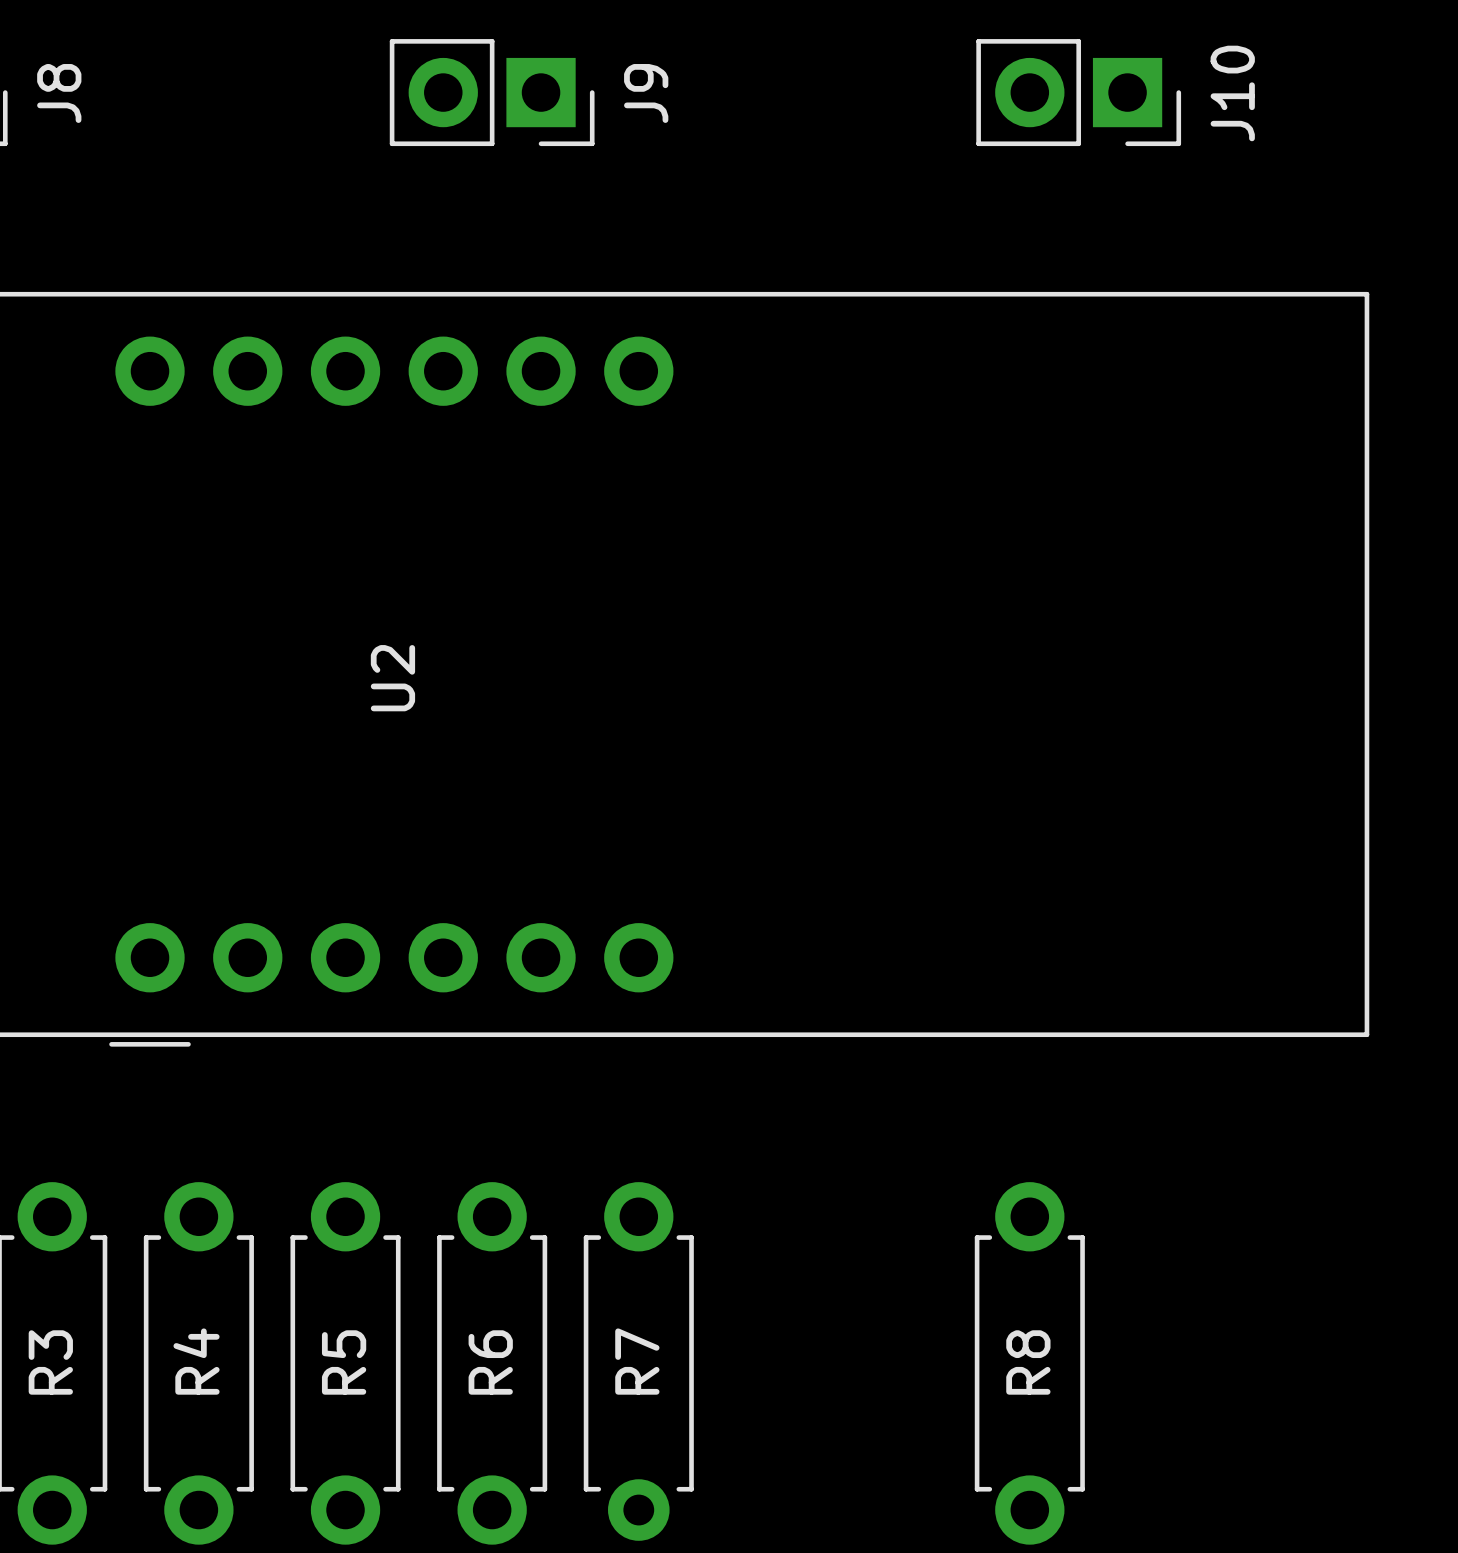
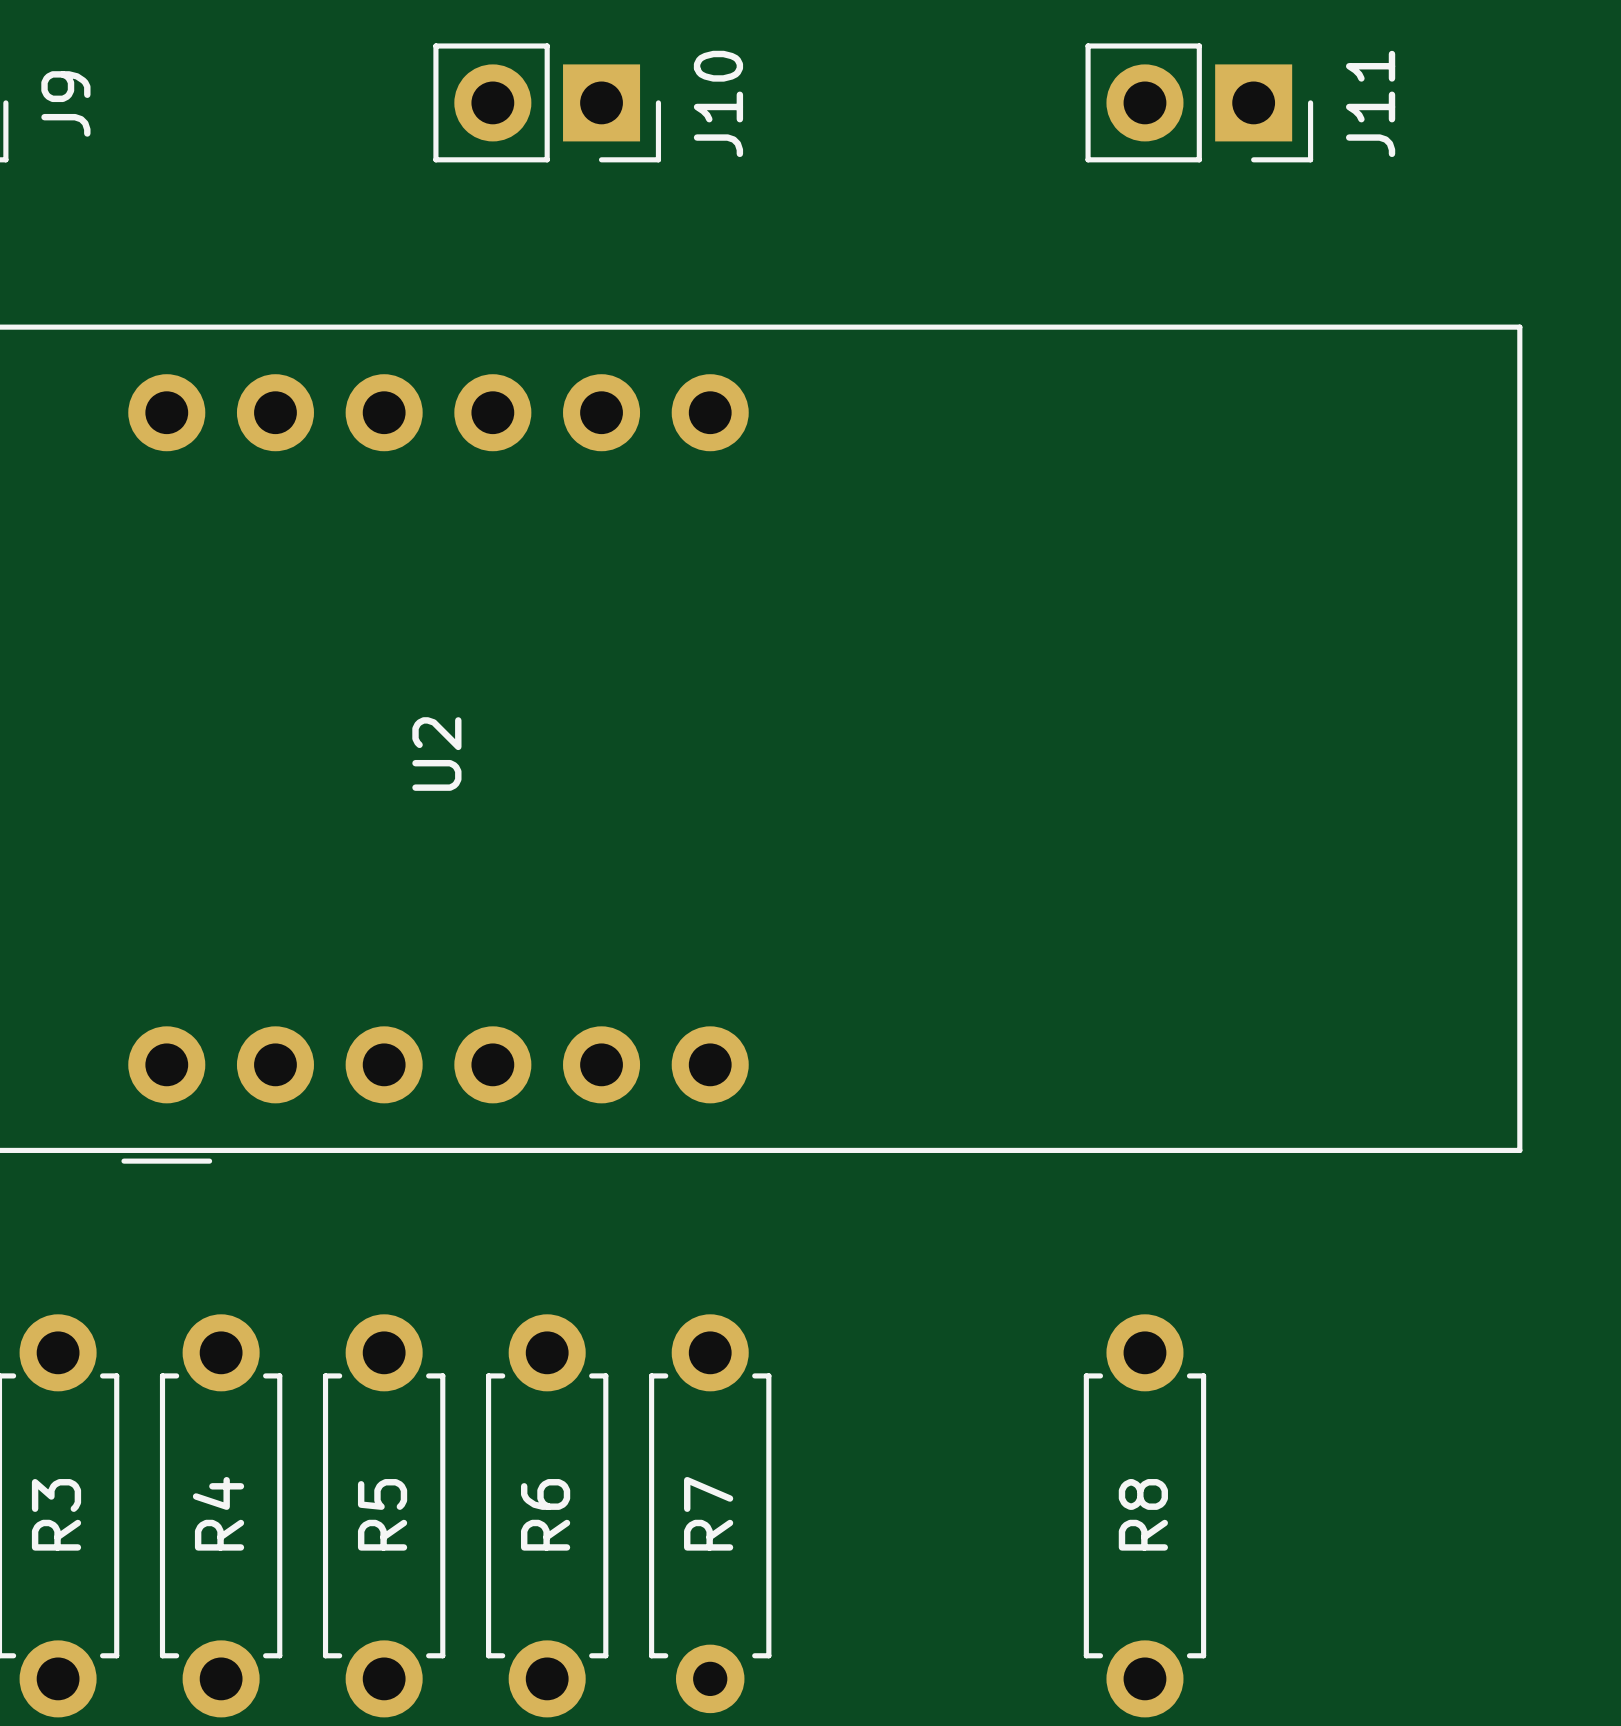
J8 name: J8 (59, 93) -> J9 (65, 103)
J9 name: J9 (646, 93) -> J10 (718, 103)
J10 name: J10 (1232, 93) -> J11 (1370, 103)

